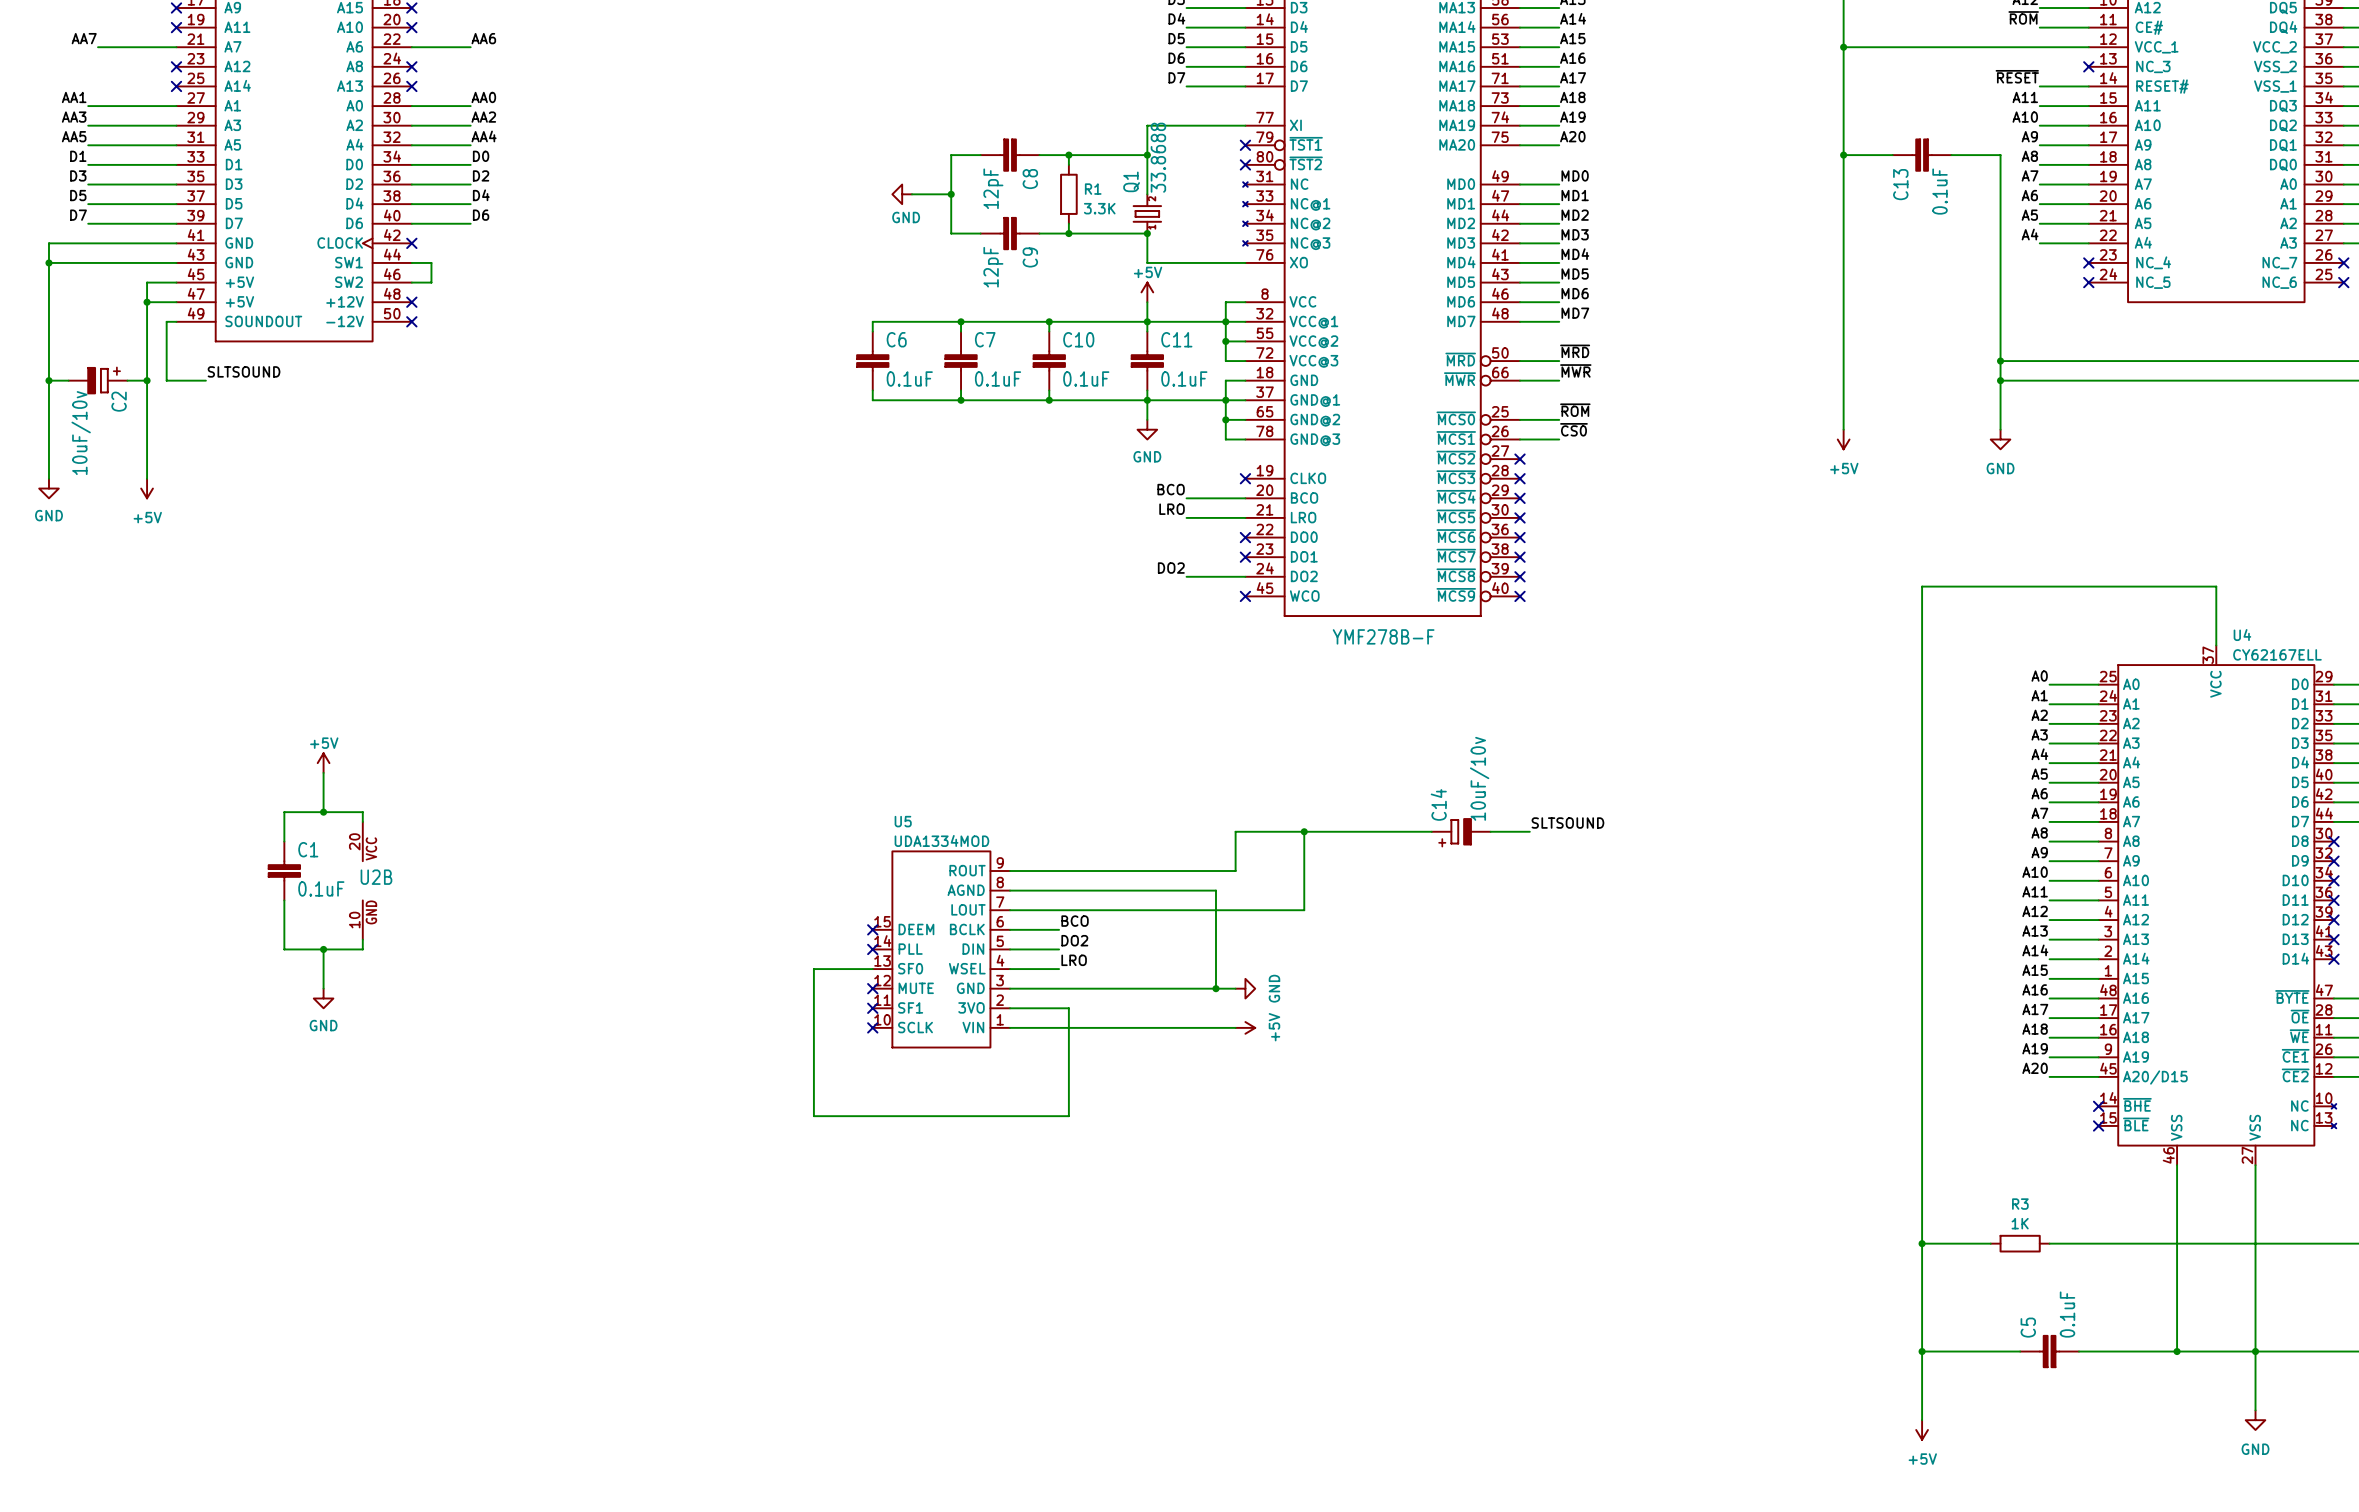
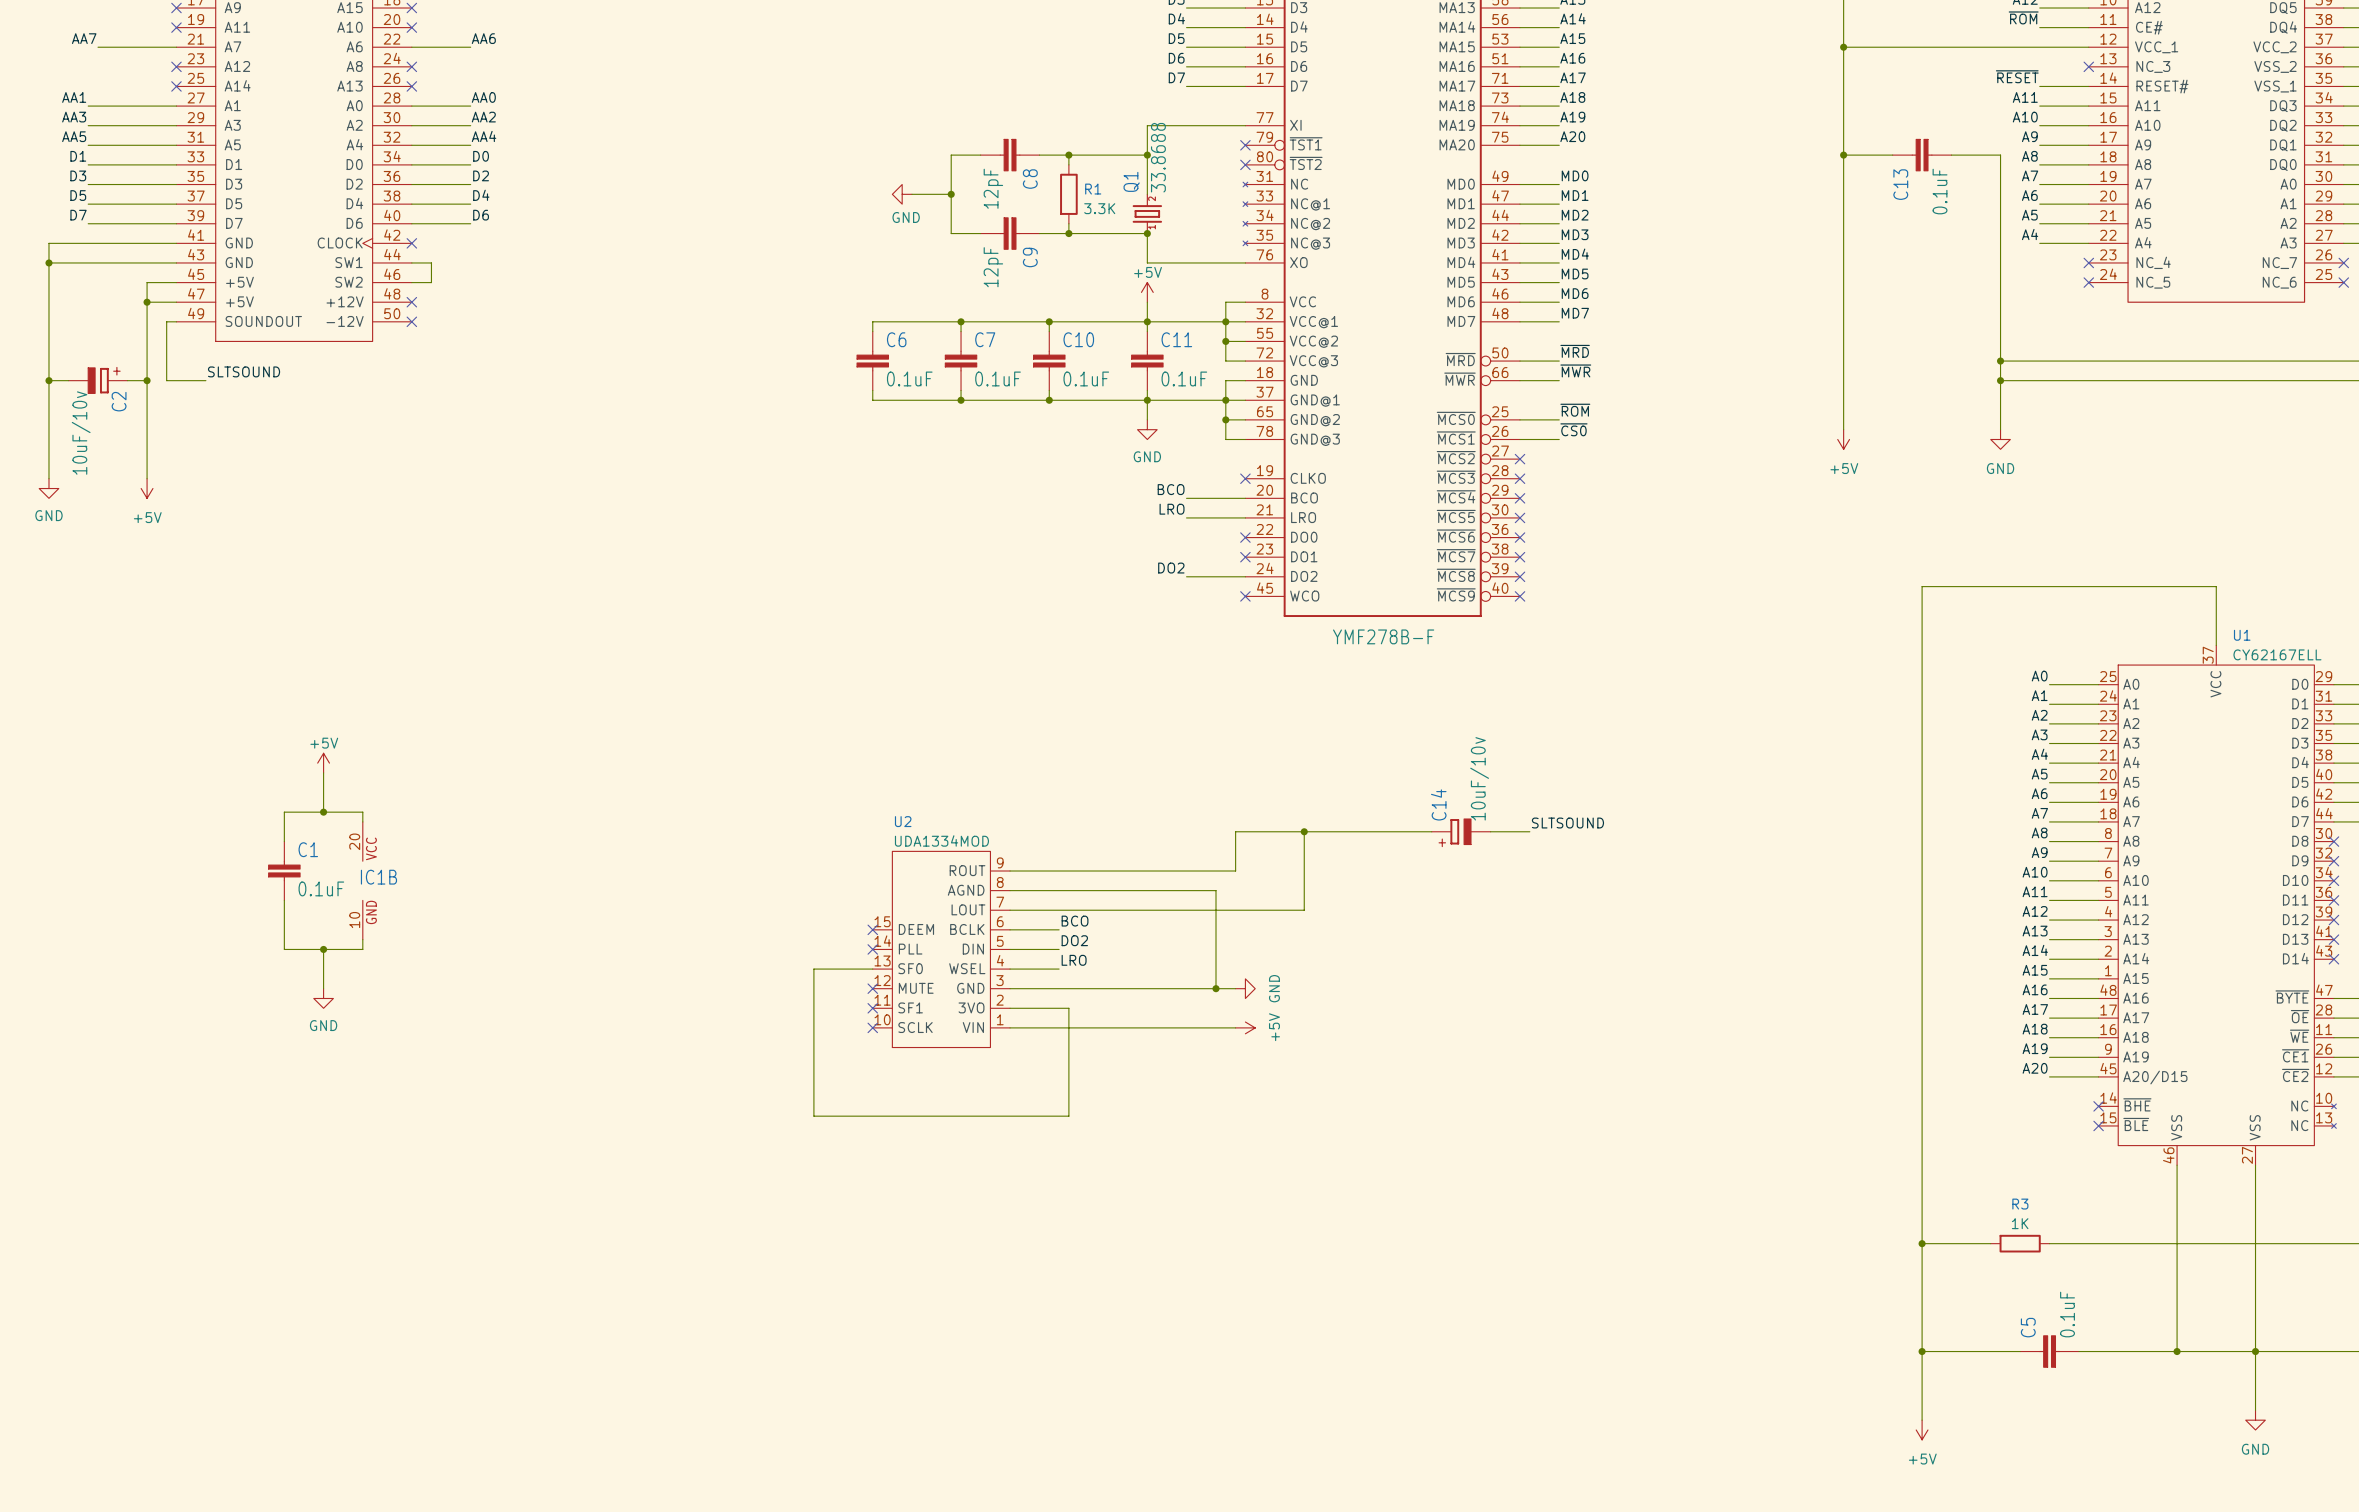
U4 name: U4 (2242, 635) -> U1 (2242, 635)
U5 name: U5 (903, 821) -> U2 (903, 821)
U2B name: U2B (376, 877) -> IC1B (378, 877)

